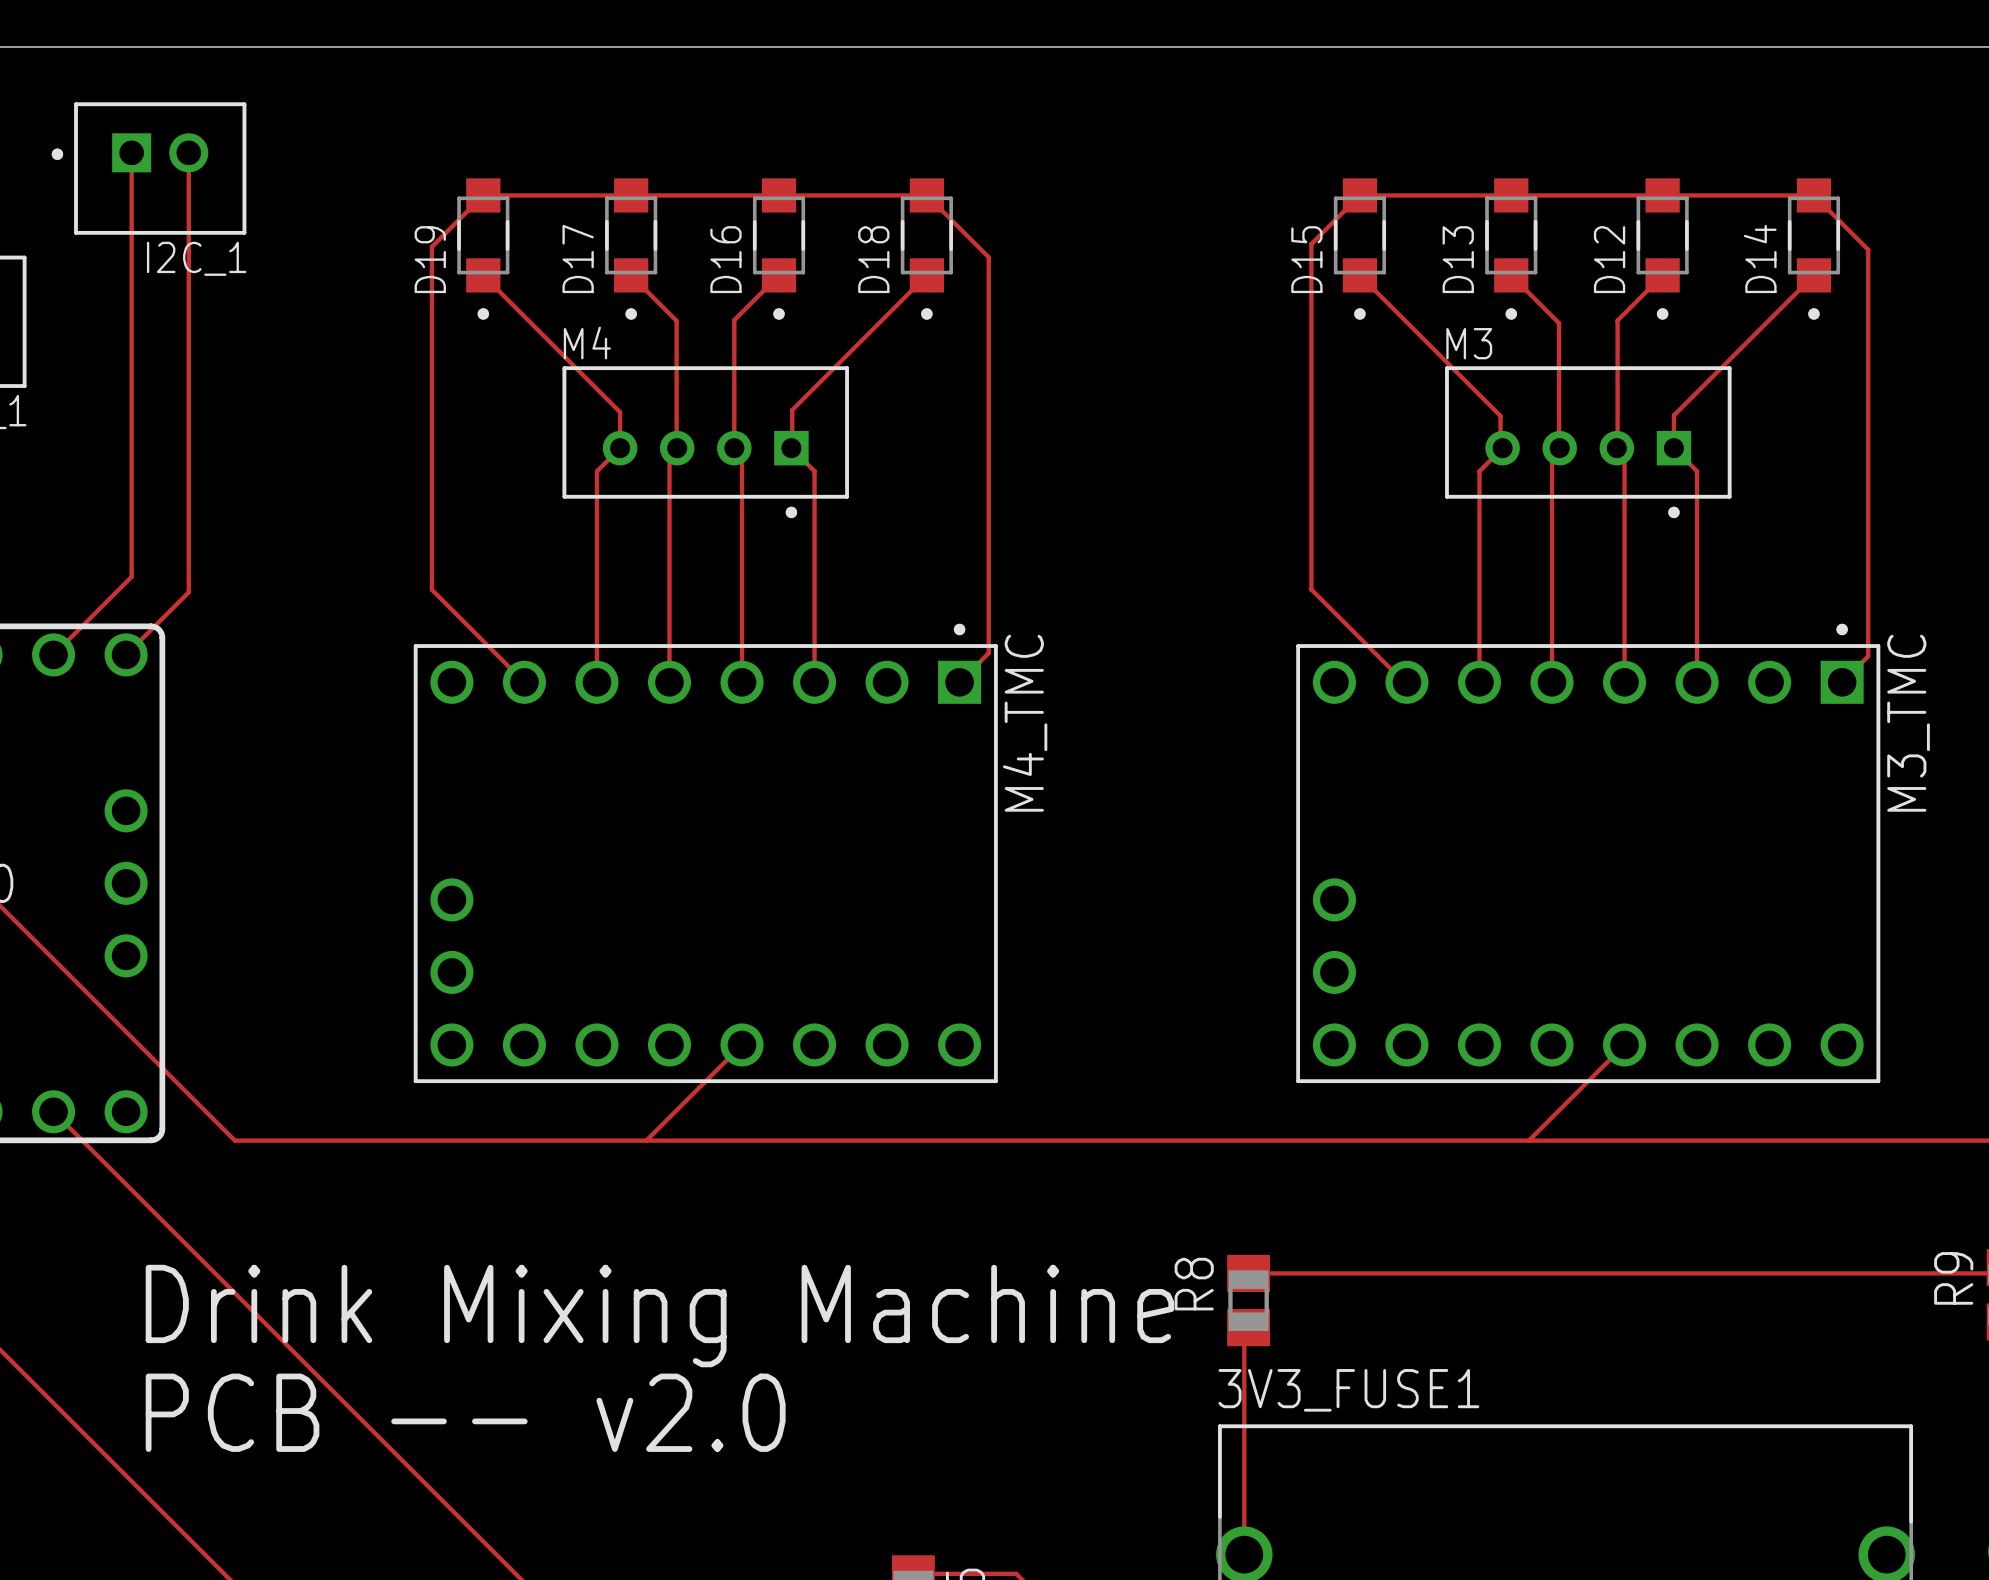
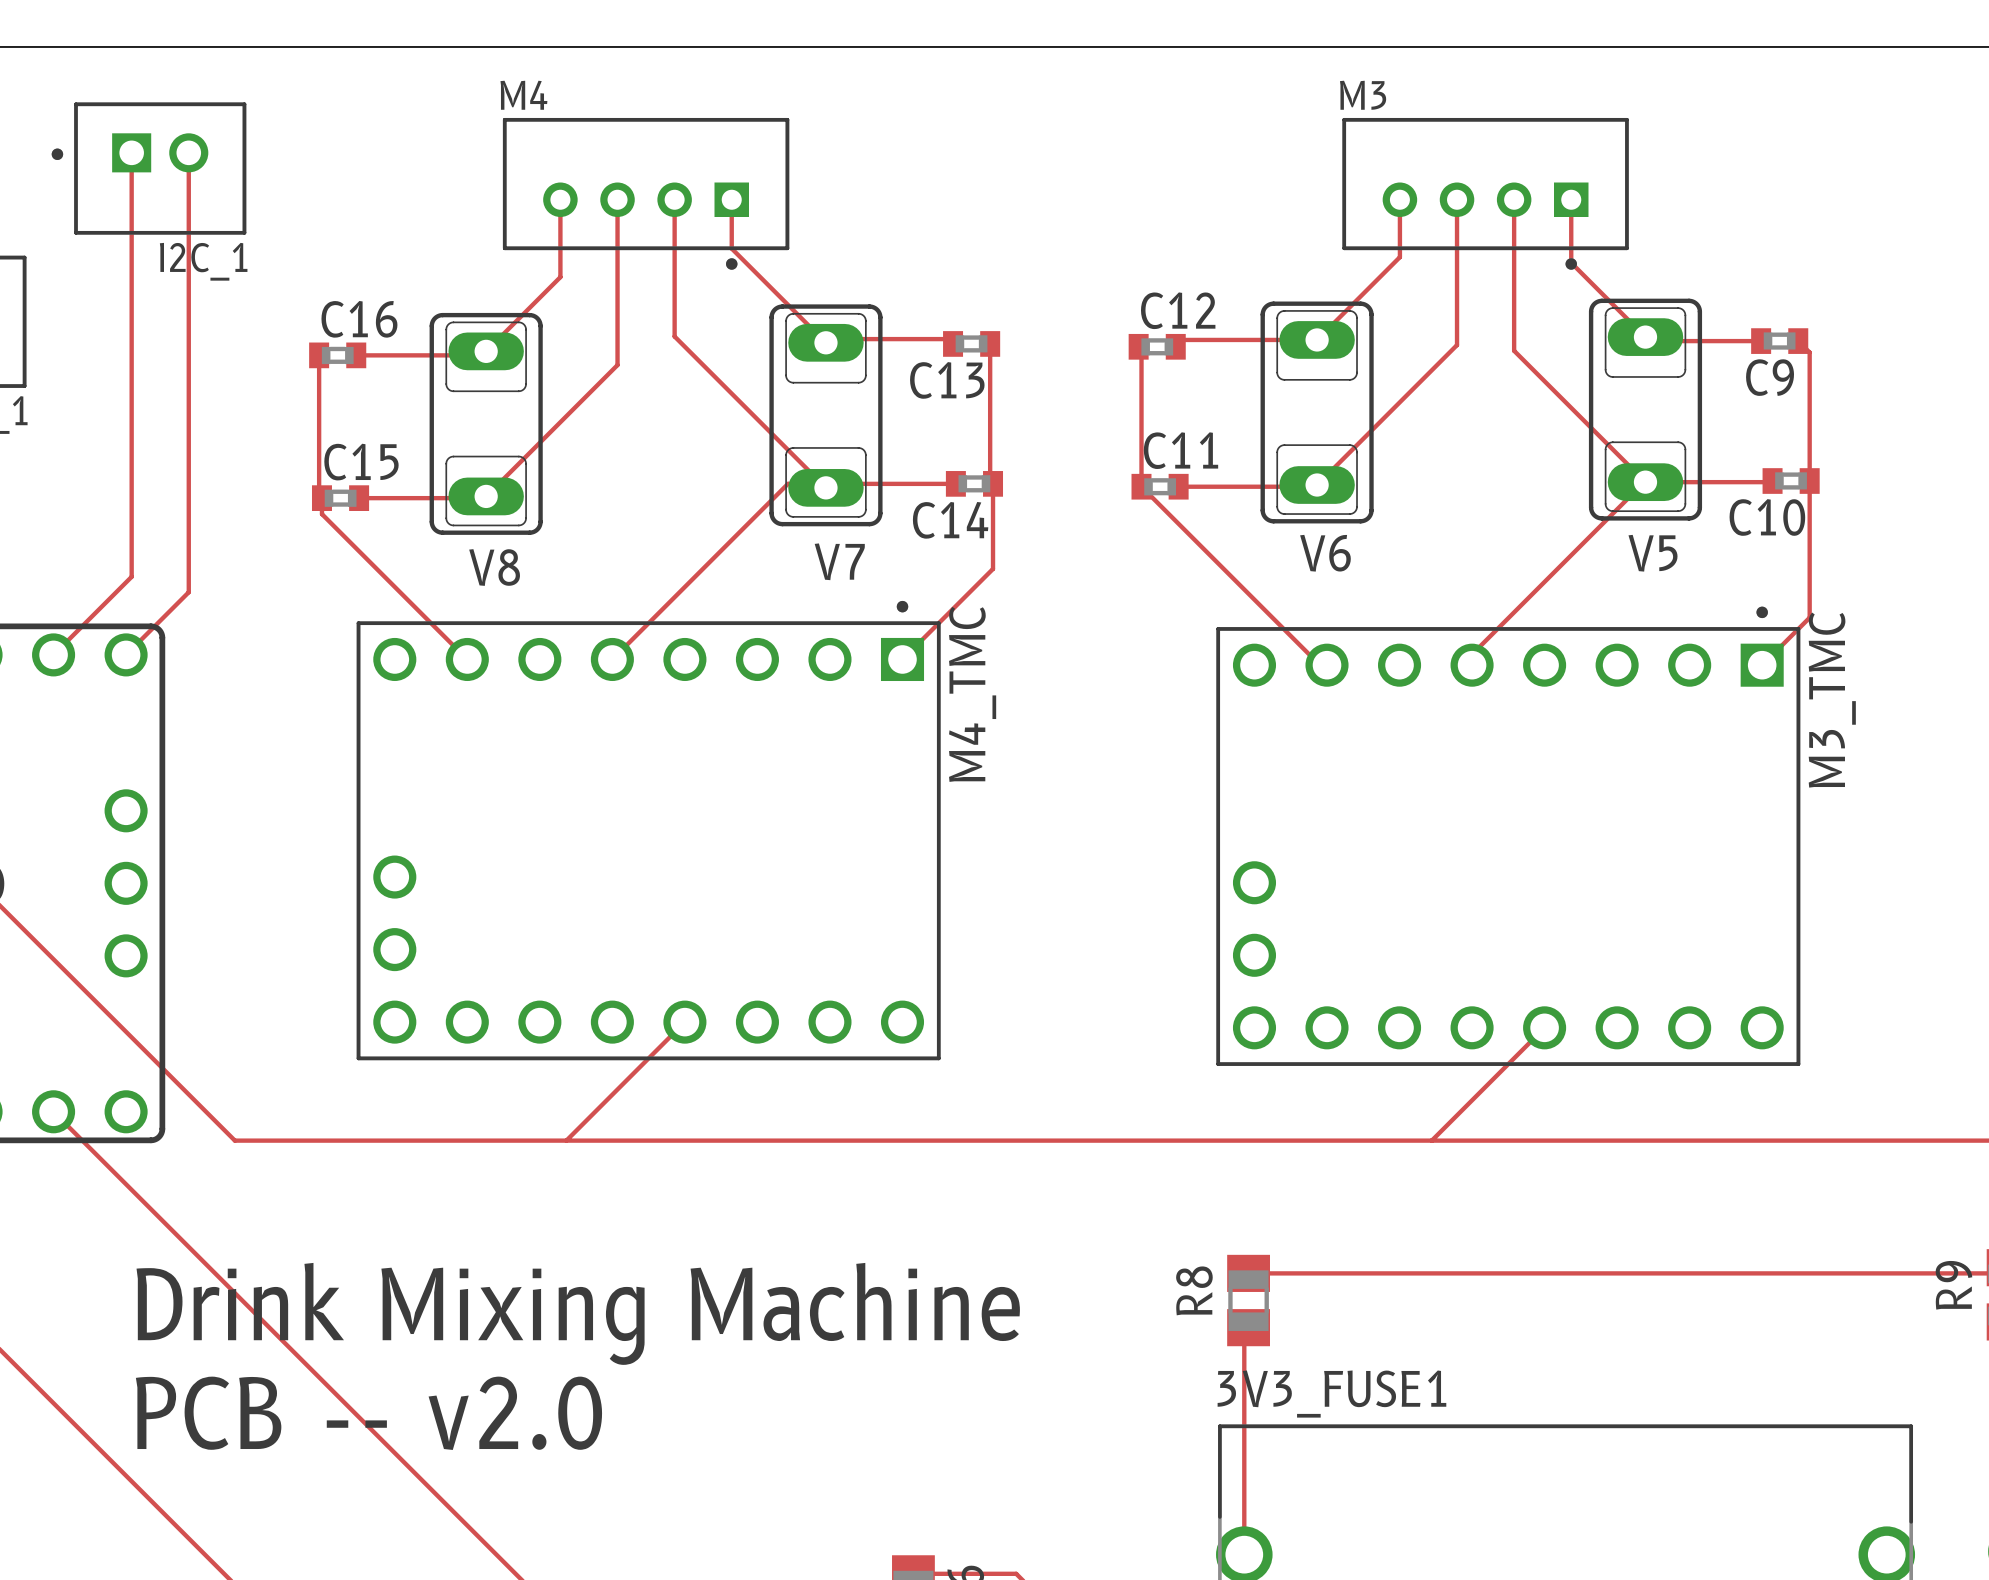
track: none -> (560, 199) (560, 277) (482, 355) (356, 355)
track: none -> (617, 199) (617, 365) (484, 498) (359, 498)
track: none -> (674, 199) (674, 336) (825, 487)
track: none -> (731, 199) (731, 248) (825, 342)
track: none -> (1399, 199) (1399, 257) (1317, 339) (1182, 339) (1175, 346)
track: none -> (1457, 199) (1457, 345) (1315, 486) (1178, 486)
track: none -> (1514, 199) (1514, 350) (1645, 482) (1772, 481)
track: none -> (1571, 199) (1571, 262) (1649, 341) (1761, 341)
D19: (483, 249) -> none
D17: (631, 249) -> none
D16: (779, 249) -> none
D18: (926, 249) -> none
D15: (1359, 249) -> none
D13: (1511, 249) -> none
D12: (1662, 249) -> none
D14: (1813, 249) -> none
track: (483, 275) (620, 412) (620, 448) (596, 471) (596, 682) -> none
track: (631, 275) (676, 320) (676, 448) -> none
track: (779, 275) (734, 320) (734, 448) (742, 455) (742, 682) -> none
track: (926, 275) (792, 410) (792, 449) -> none
track: (1359, 275) (1500, 416) (1500, 450) -> none
track: (1511, 275) (1559, 323) (1559, 448) -> none
track: (1662, 275) (1617, 320) (1617, 448) -> none
track: (1813, 275) (1673, 415) (1673, 448) (1697, 471) (1697, 682) -> none
track: none -> (822, 339) (948, 339) (953, 343)
C9: none -> (1779, 341)
track: none -> (1798, 341) (1809, 352) (1809, 617) (1762, 665)
C13: none -> (971, 343)
track: none -> (990, 343) (990, 481) (993, 483) (993, 568) (902, 659)
track: none -> (1138, 346) (1141, 349) (1141, 486) (1319, 665) (1327, 665)
C12: none -> (1157, 346)
track: none -> (319, 355) (319, 495) (321, 498) (321, 514) (467, 659)
C16: none -> (337, 355)
V5: none -> (1645, 409)
V6: none -> (1317, 412)
V7: none -> (825, 415)
V8: none -> (486, 423)
M4 position: (705, 442) -> (646, 193)
M3 position: (1588, 442) -> (1485, 193)
track: (677, 448) (669, 455) (669, 682) -> none
track: (791, 448) (814, 471) (814, 682) -> none
track: (1502, 448) (1479, 471) (1479, 682) -> none
track: (1559, 448) (1552, 455) (1552, 682) -> none
track: (1616, 448) (1624, 455) (1624, 682) -> none
track: none -> (1644, 481) (1472, 654) (1472, 665)
C10: none -> (1791, 481)
track: none -> (955, 483) (787, 483) (612, 659)
C14: none -> (974, 483)
C11: none -> (1160, 486)
C15: none -> (340, 498)
track: (524, 682) (431, 589) (431, 246) (483, 195) (926, 195) (988, 257) (988, 653) (959, 682) -> none
track: (1406, 682) (1404, 682) (1311, 589) (1311, 244) (1359, 195) (1813, 195) (1868, 249) (1868, 656) (1842, 682) -> none
M4_TMC position: (705, 853) -> (648, 830)
M3_TMC position: (1588, 853) -> (1508, 836)
track: none -> (684, 1022) (566, 1140)
track: none -> (1544, 1027) (1431, 1140)
track: (742, 1044) (646, 1140) -> none
track: (1624, 1044) (1528, 1140) -> none

